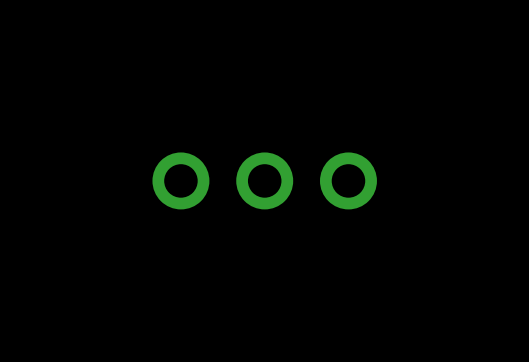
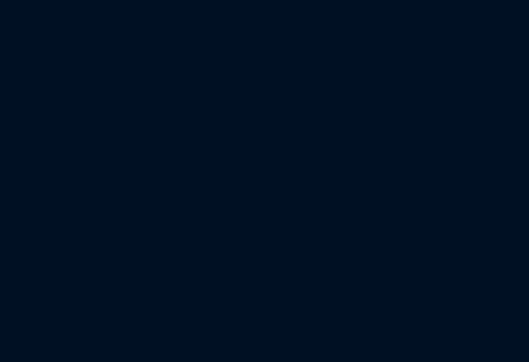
part: (264, 180) -> none

